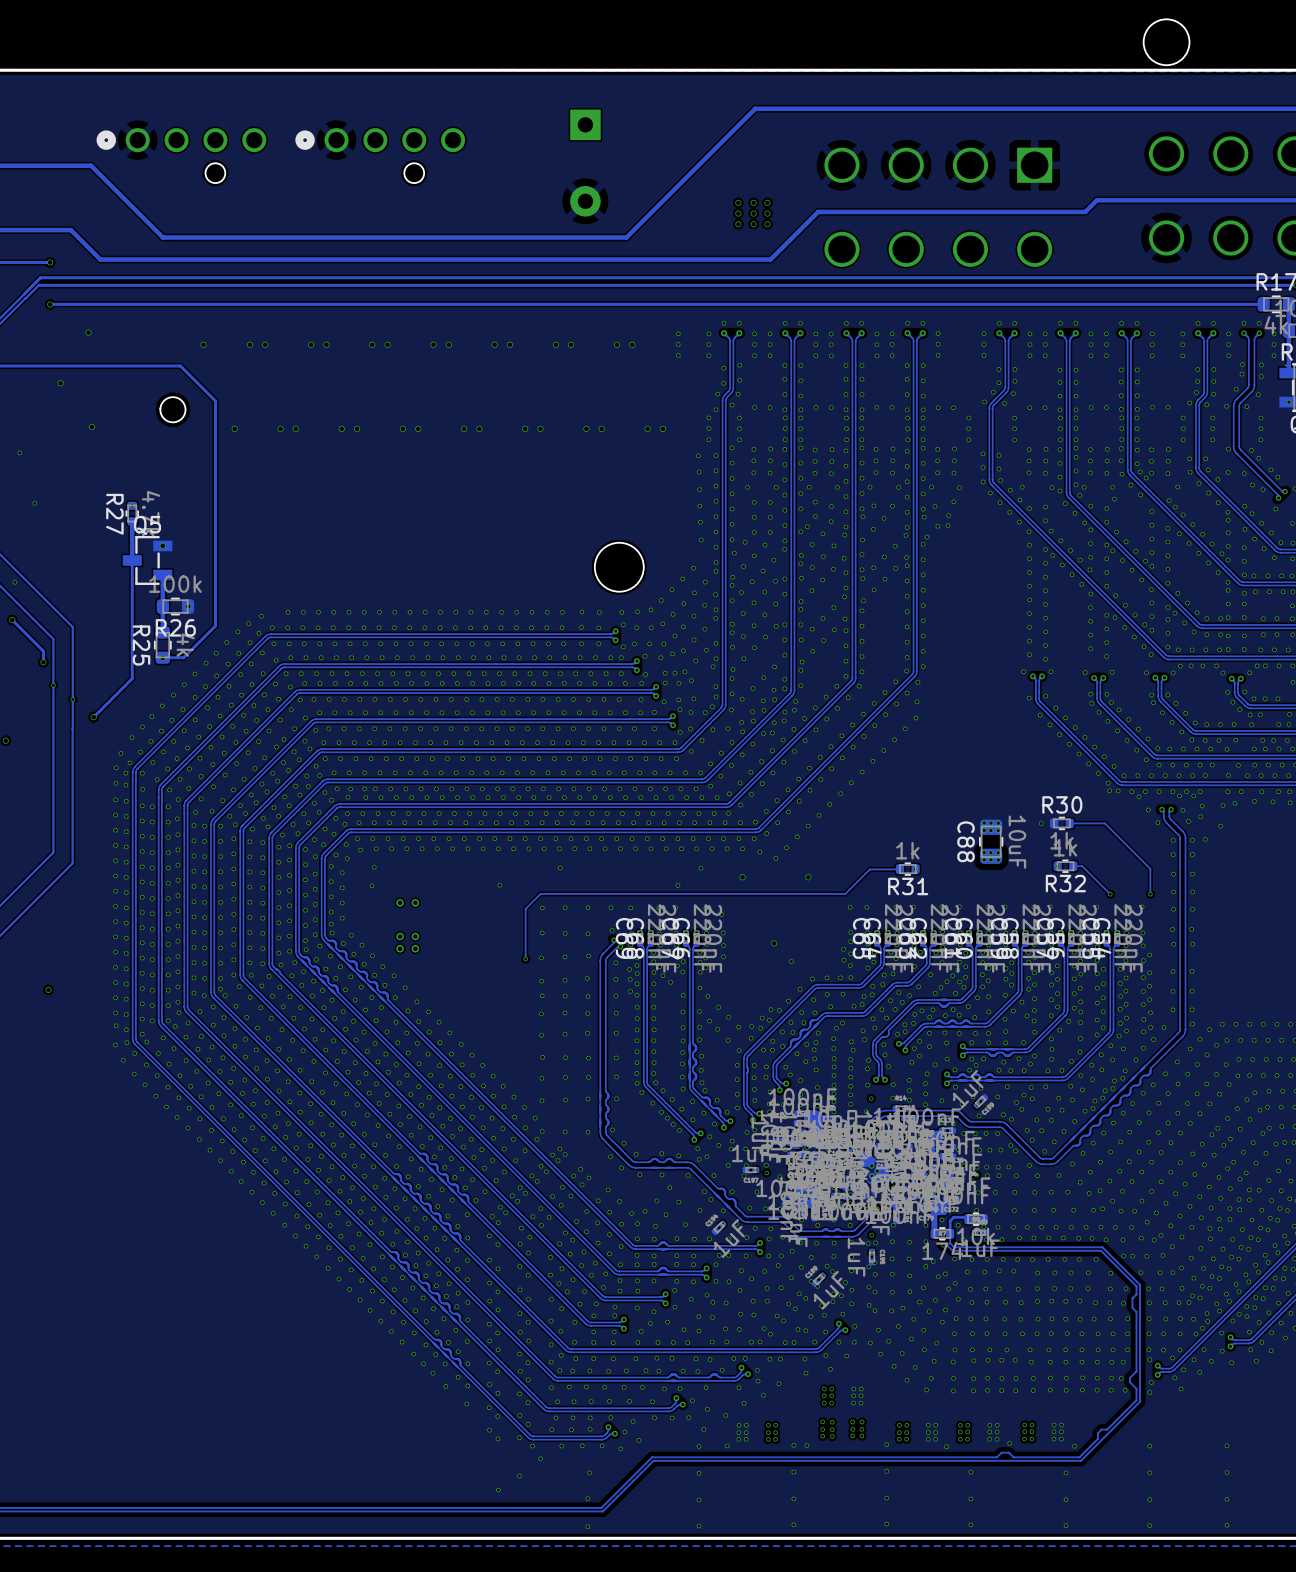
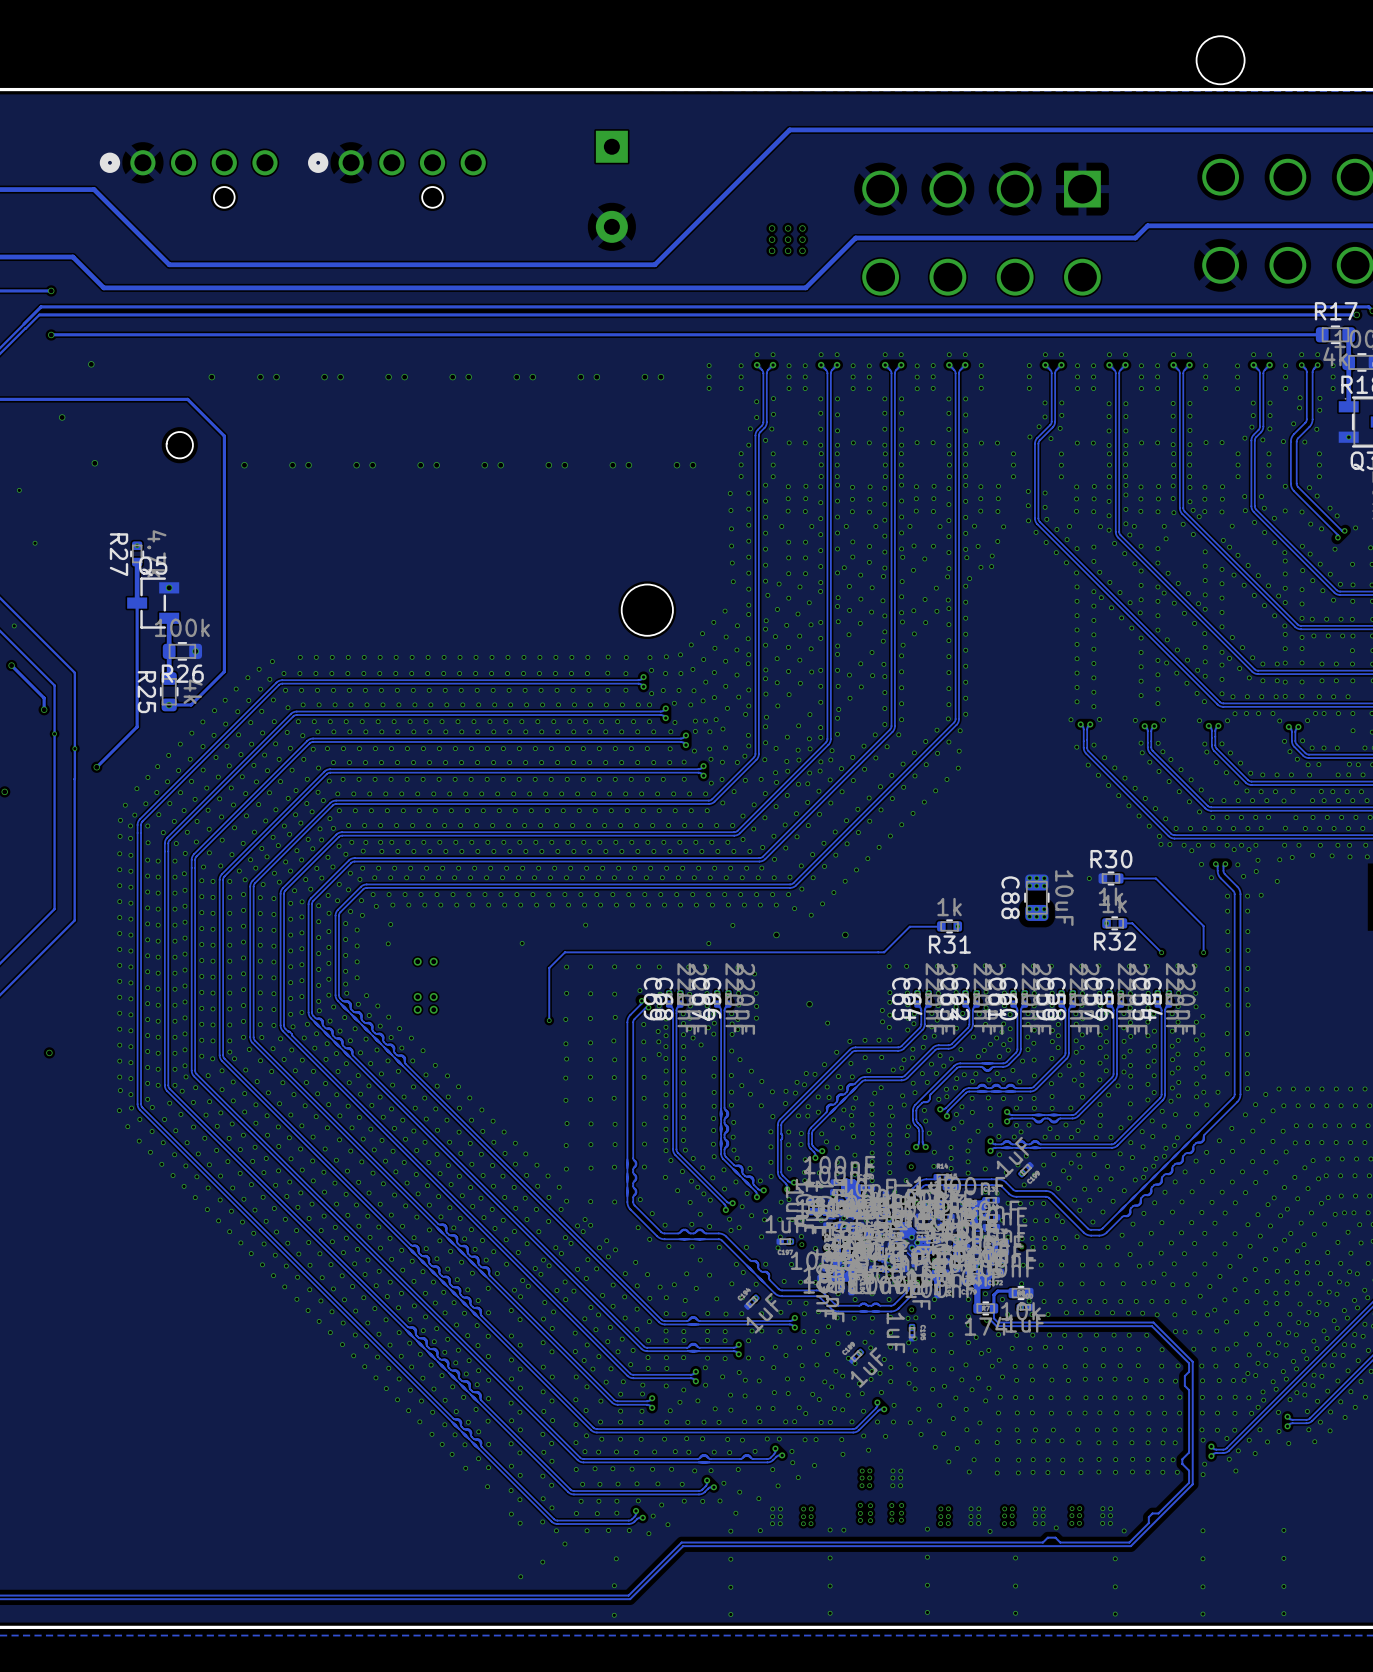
via: none -> (665, 1177)
via: none -> (677, 1190)
via: none -> (690, 1202)
via: none -> (700, 1214)

